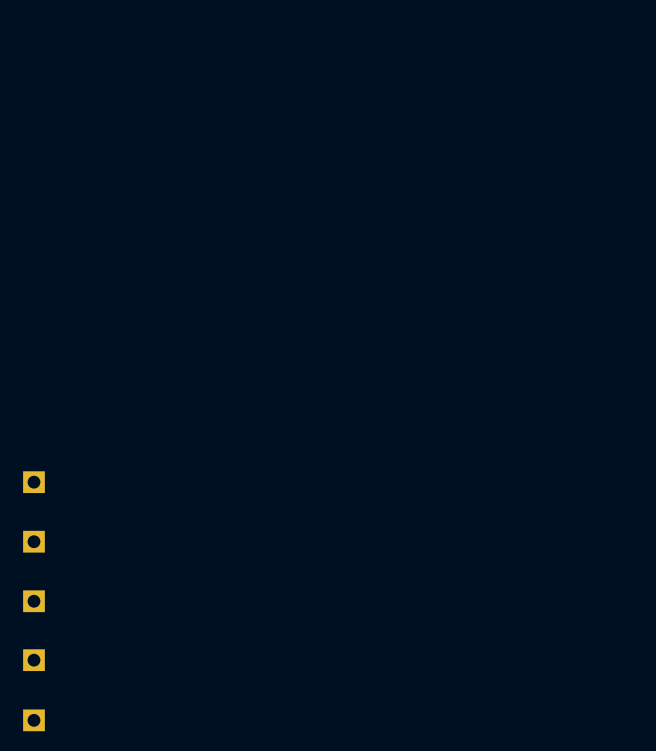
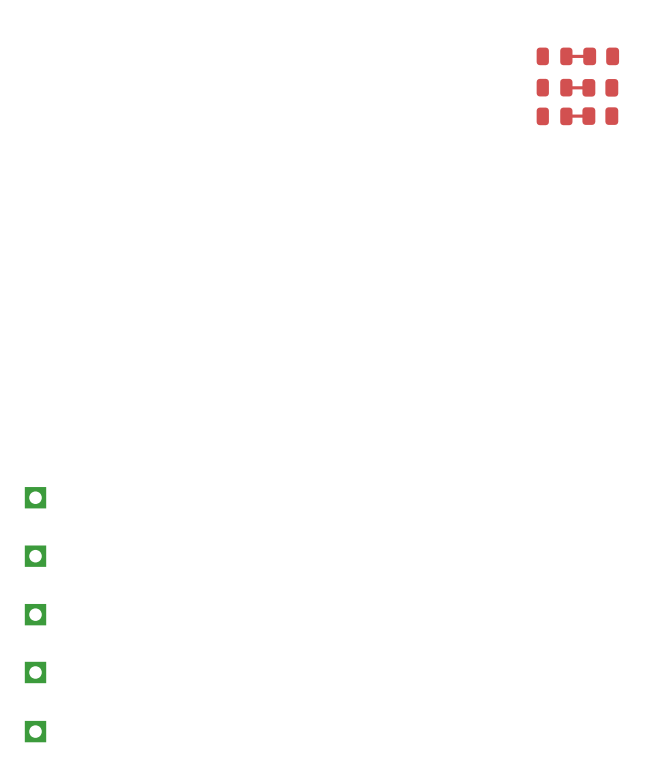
part: none -> (554, 56)
top track: none -> (589, 56) (566, 56)
part: none -> (601, 56)
part: none -> (554, 87)
top track: none -> (588, 87) (566, 87)
part: none -> (600, 87)
part: none -> (554, 116)
top track: none -> (588, 116) (566, 116)
part: none -> (600, 116)

